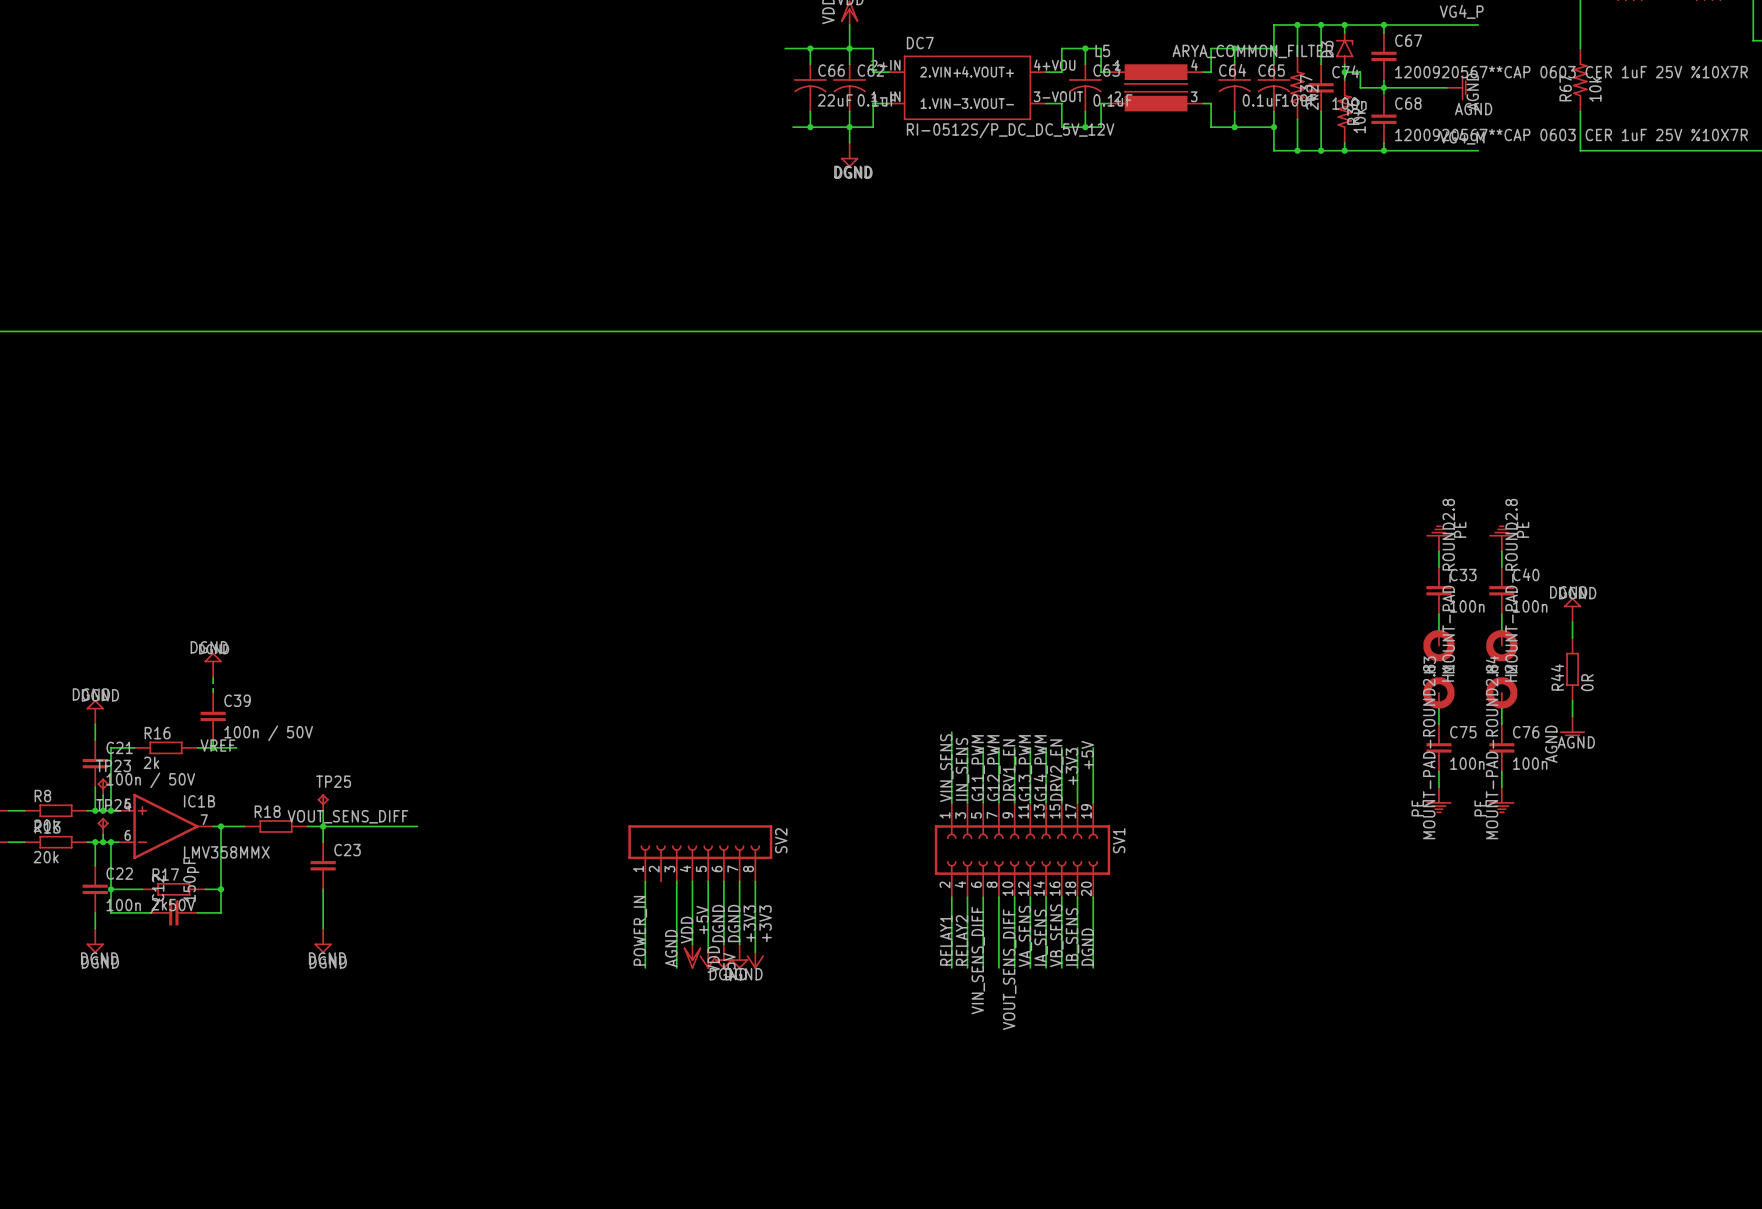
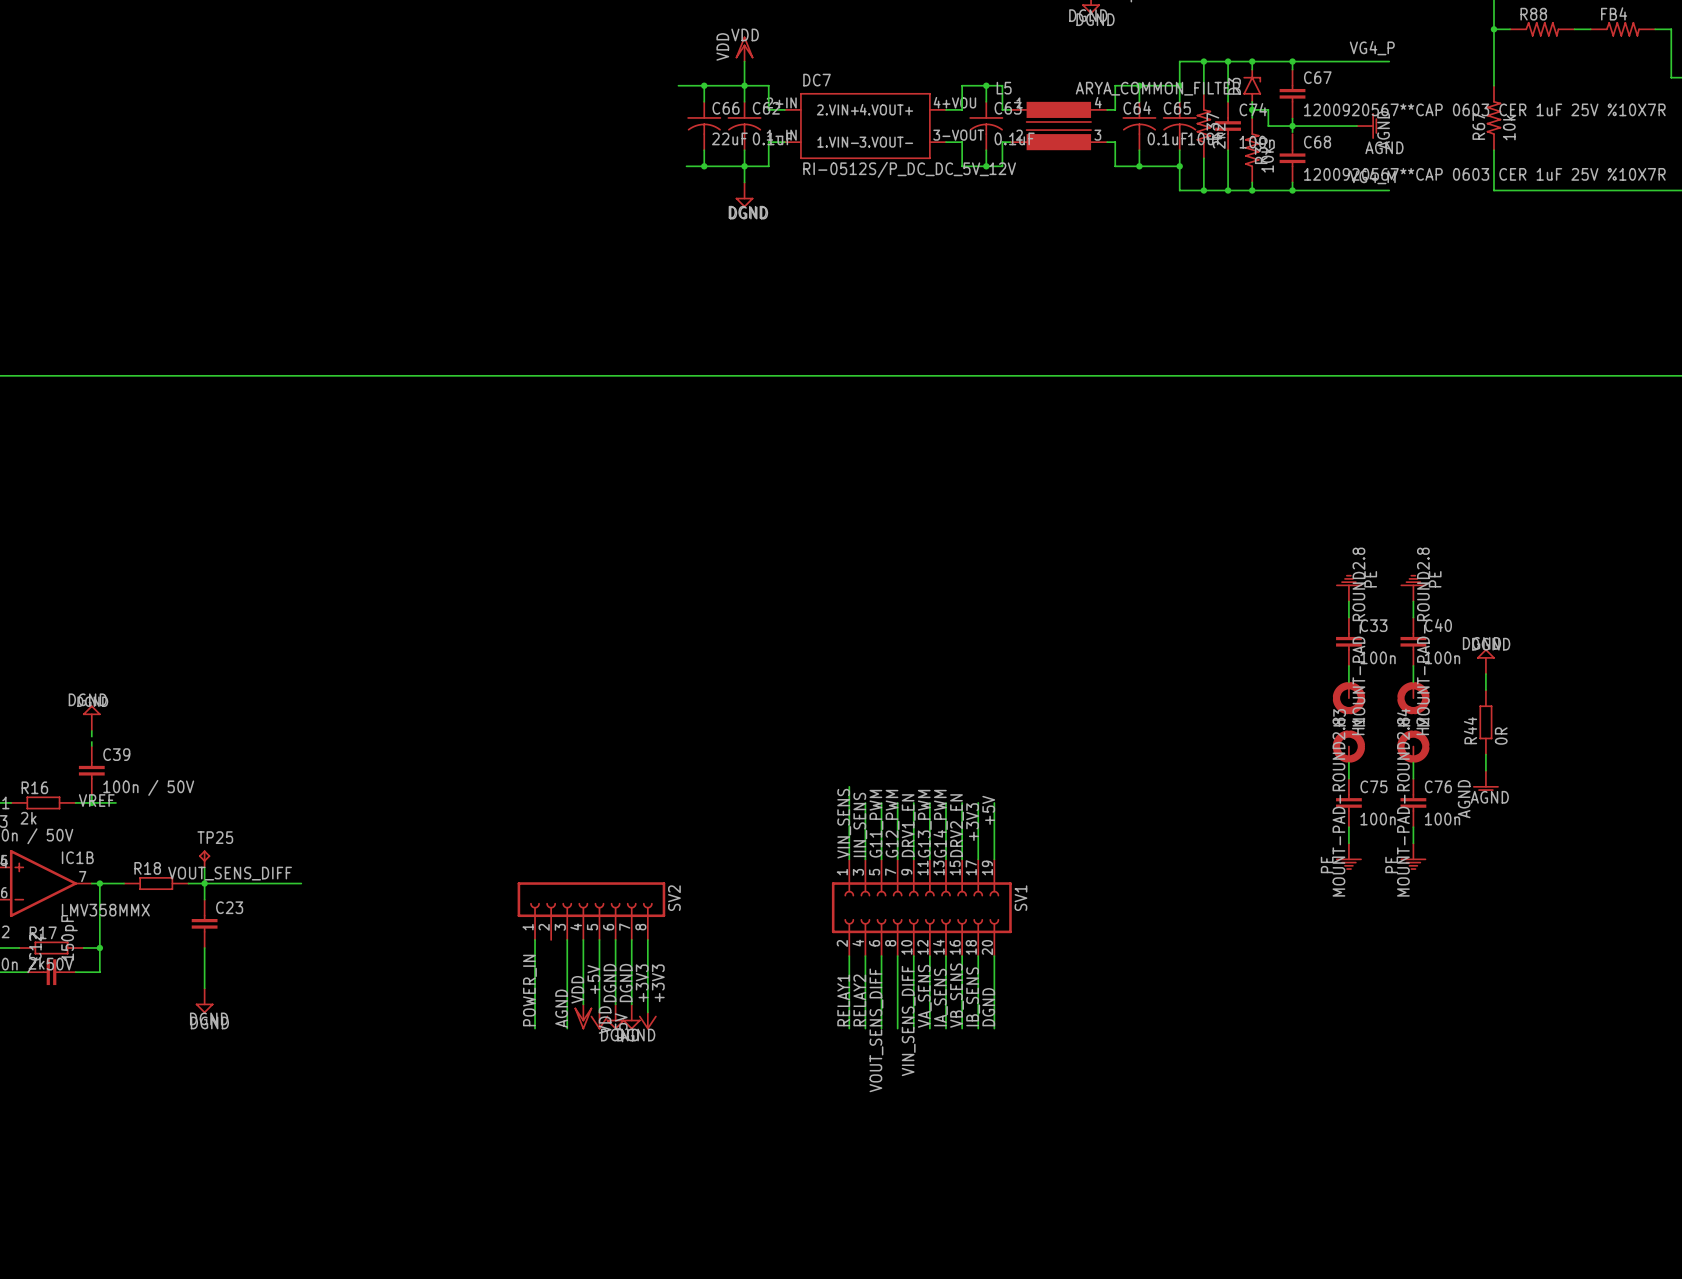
label position: VIN_SENS_DIFF (978, 960) -> VIN_SENS_DIFF (908, 1020)
label position: VOUT_SENS_DIFF (1009, 969) -> VOUT_SENS_DIFF (876, 1030)

